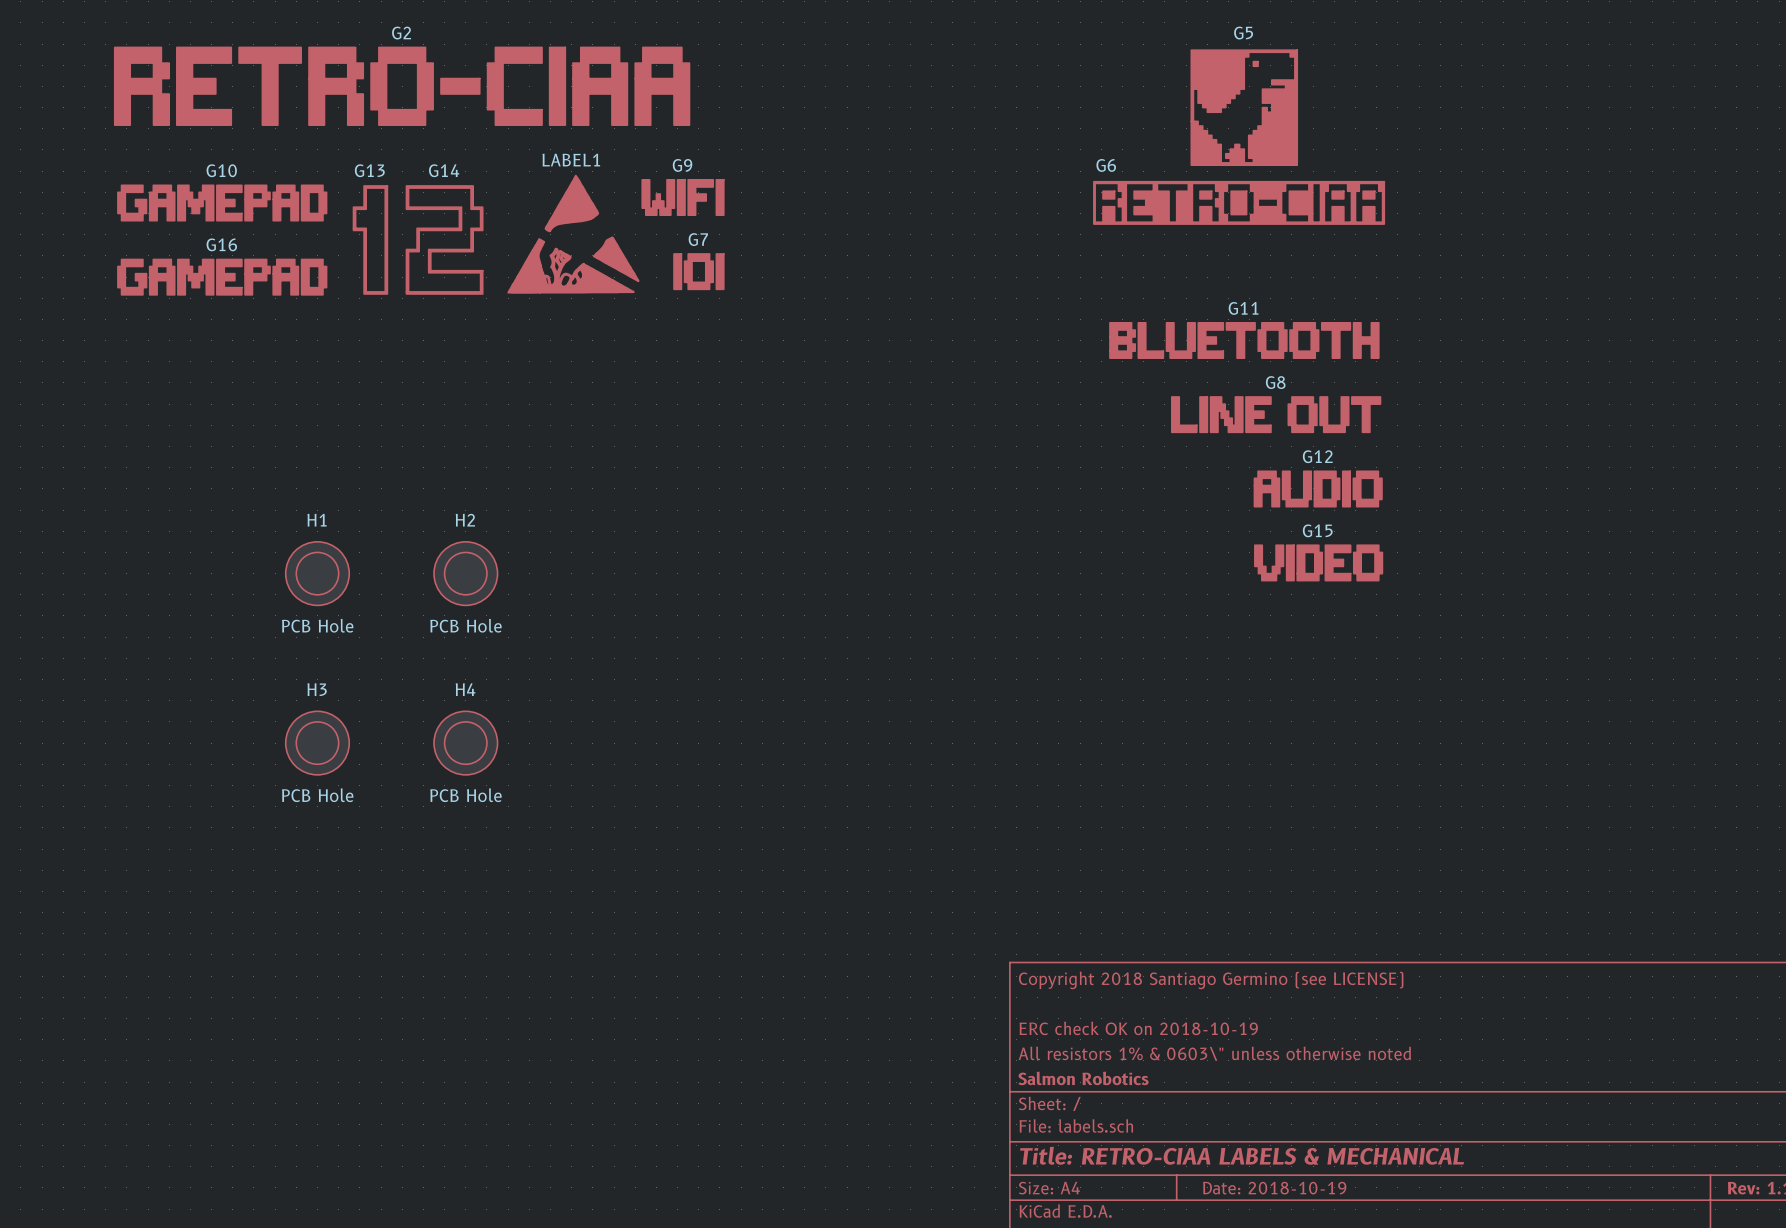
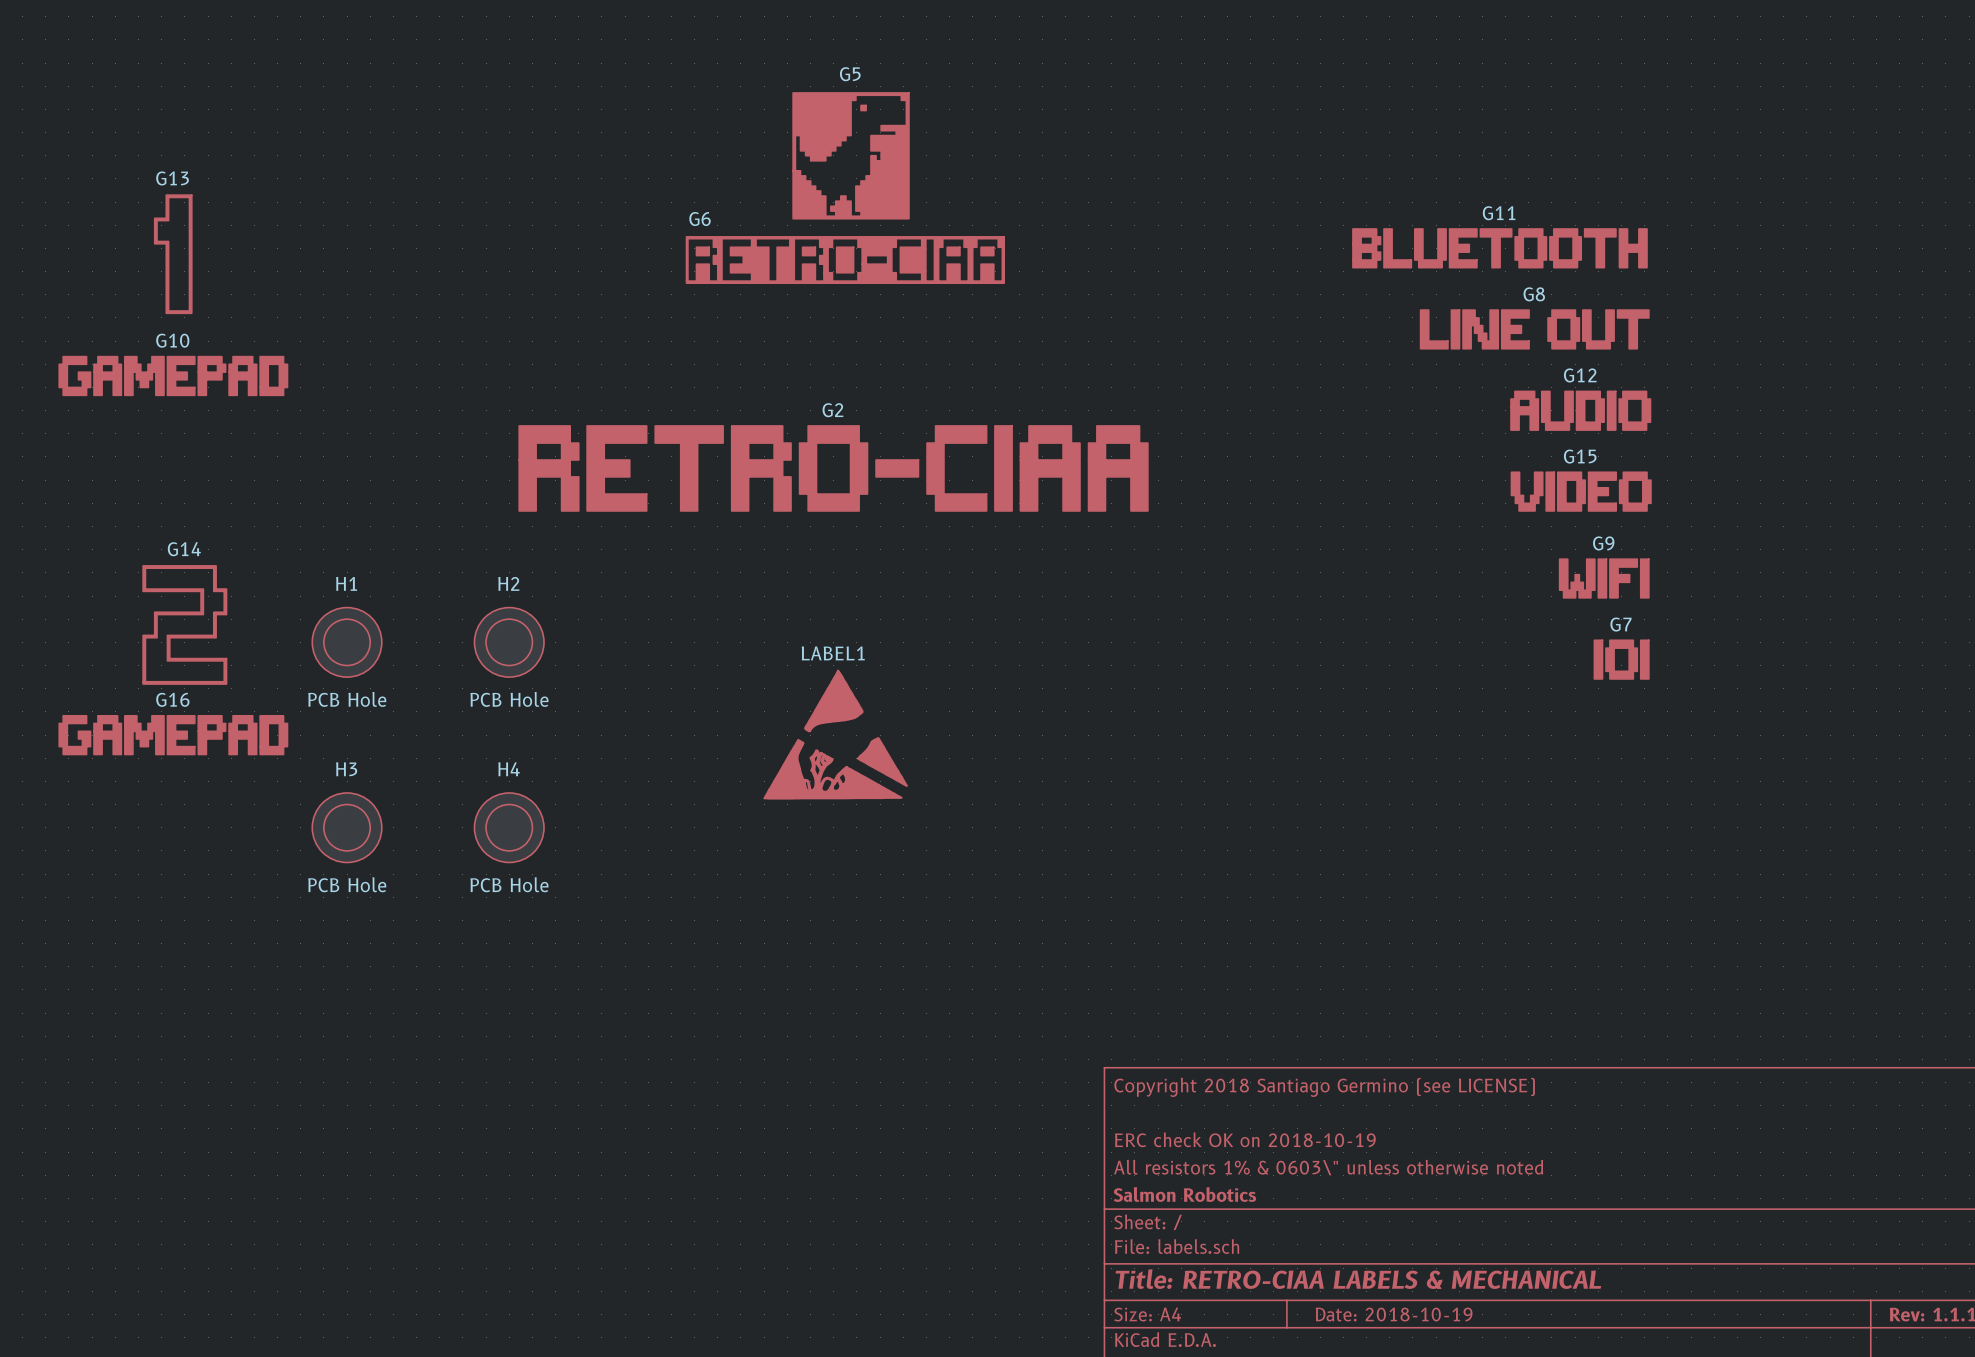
G2 position: (402, 86) -> (833, 468)
G5 position: (1244, 107) -> (851, 155)
G9 position: (683, 197) -> (1604, 578)
G6 position: (1239, 202) -> (845, 260)
G10 position: (222, 203) -> (173, 375)
LABEL1 position: (573, 234) -> (835, 734)
G13 position: (370, 239) -> (173, 254)
G14 position: (444, 239) -> (184, 624)
G7 position: (698, 271) -> (1621, 659)
G16 position: (222, 277) -> (173, 735)
G11 position: (1244, 340) -> (1499, 248)
G8 position: (1276, 414) -> (1534, 329)
G12 position: (1318, 488) -> (1580, 410)
G15 position: (1318, 562) -> (1581, 491)

